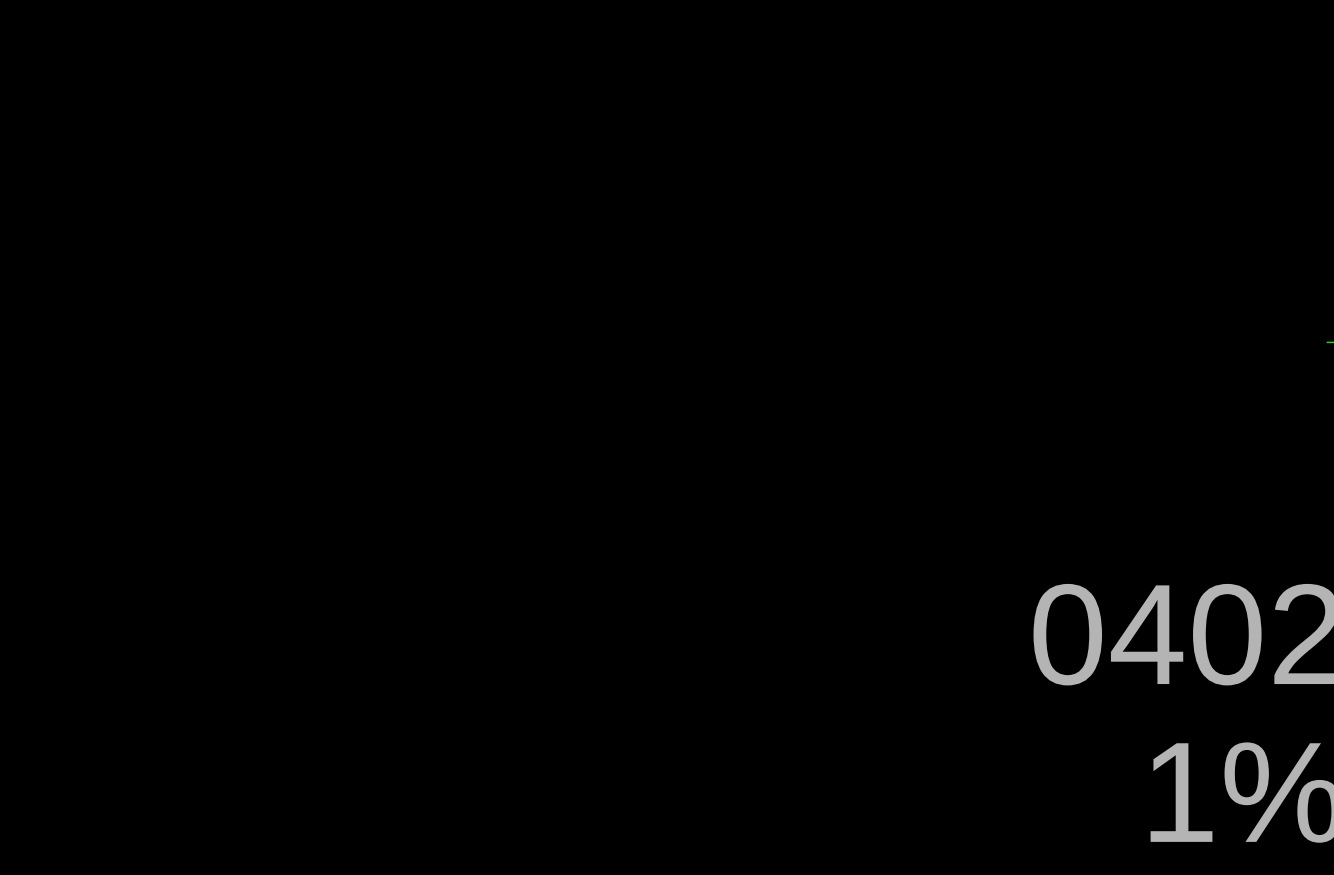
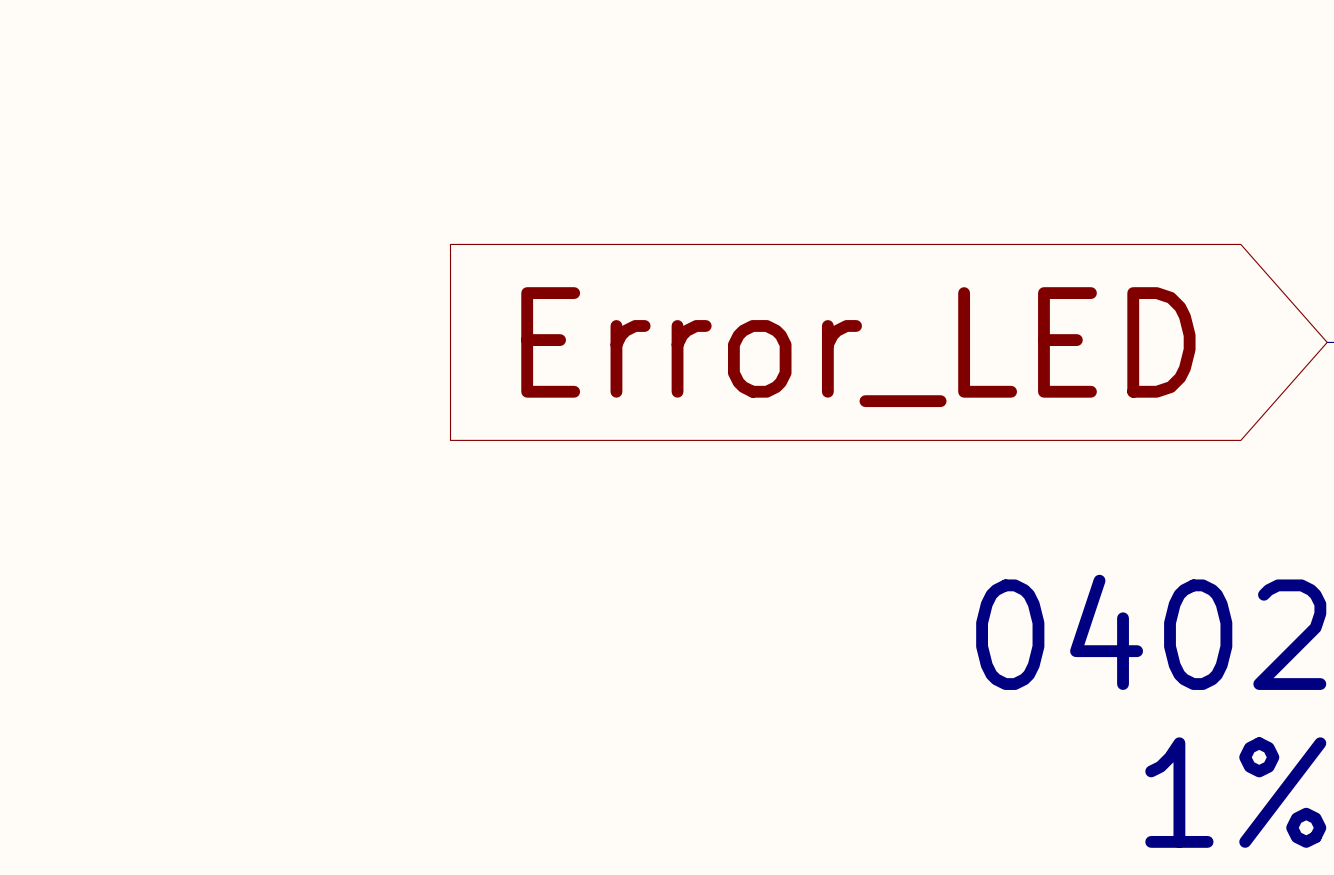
global label: none -> Error_LED (858, 347)

